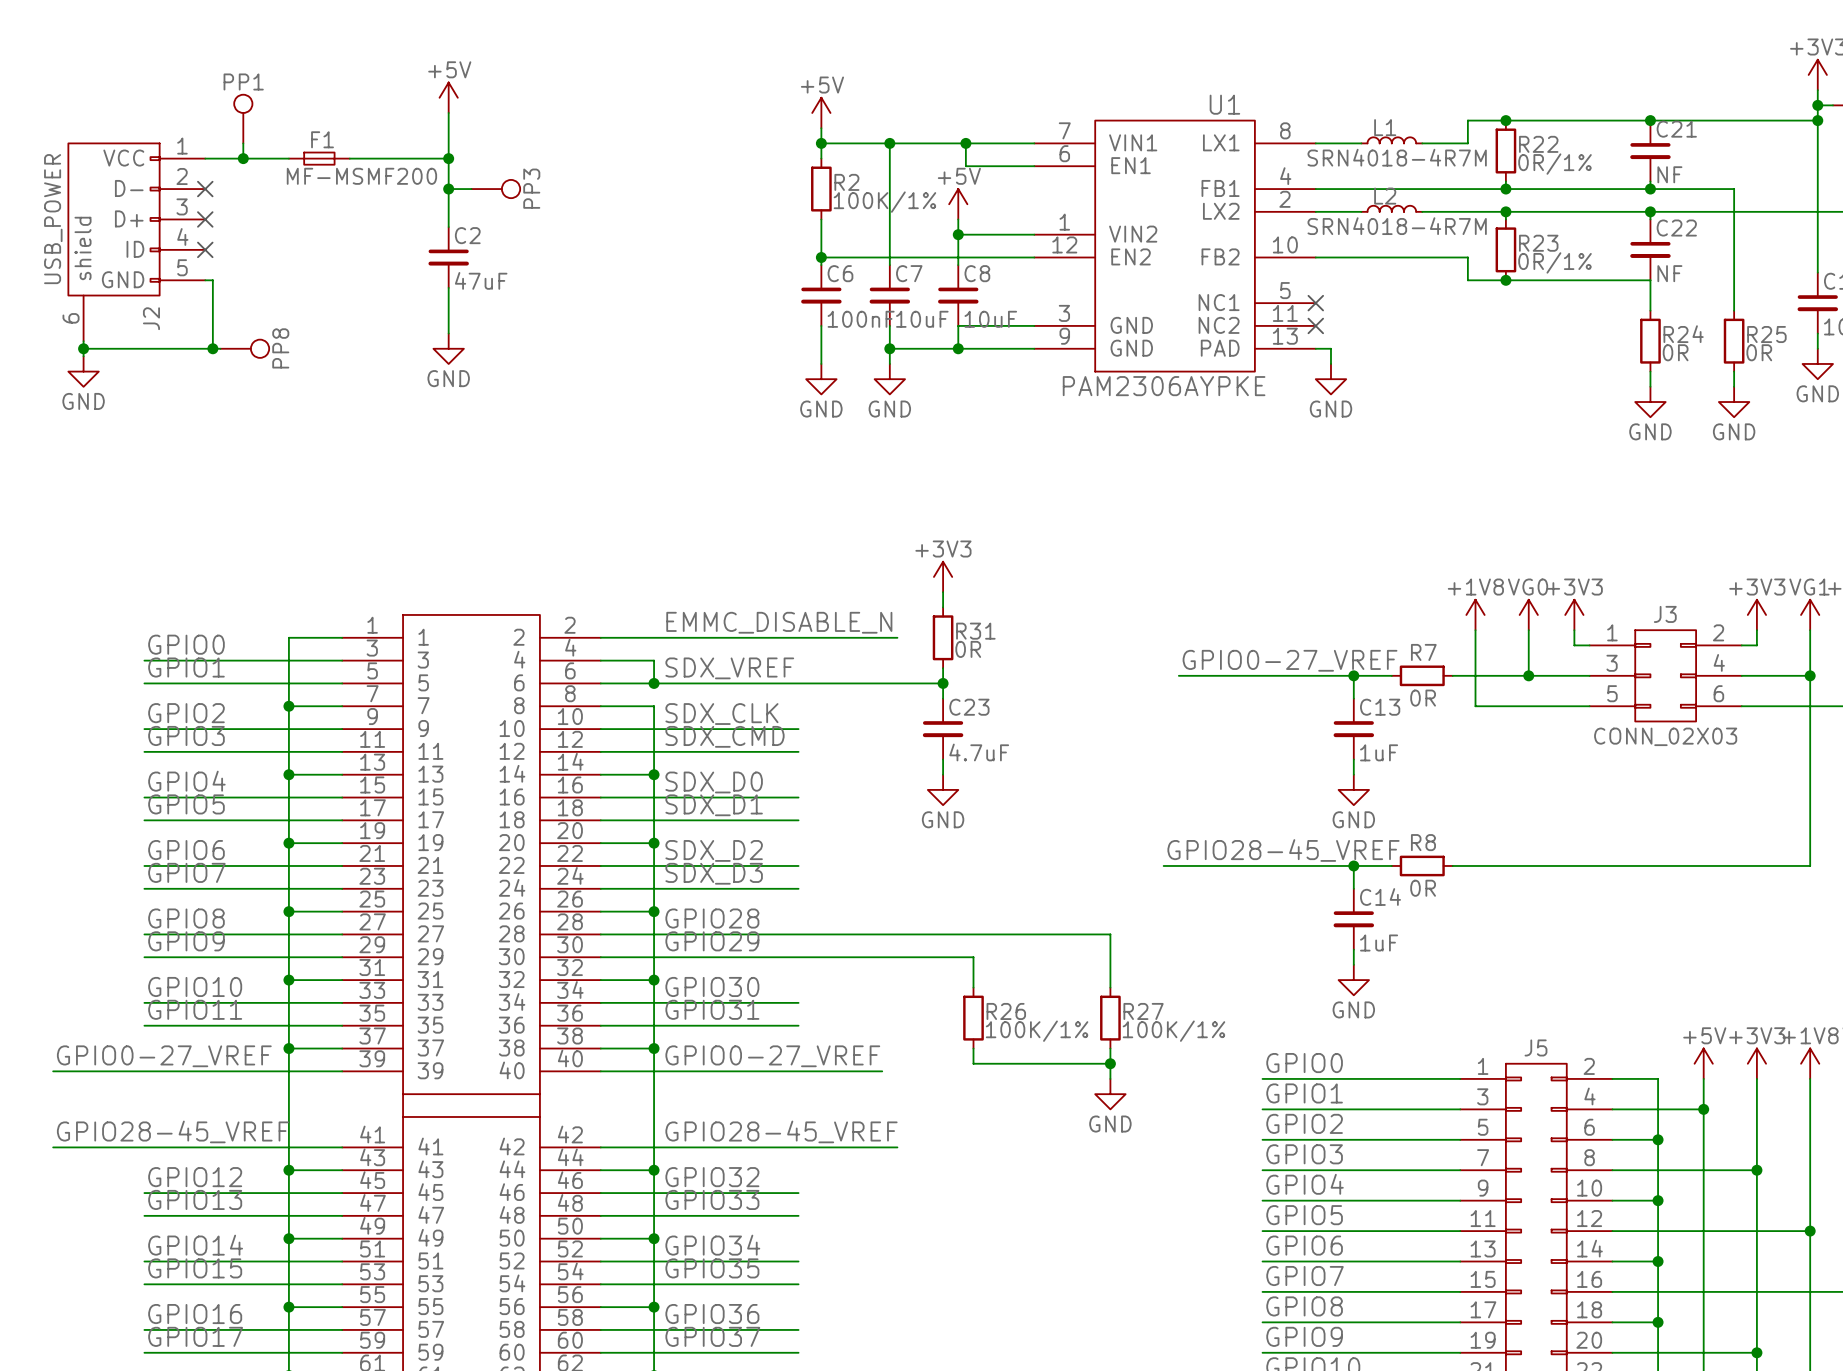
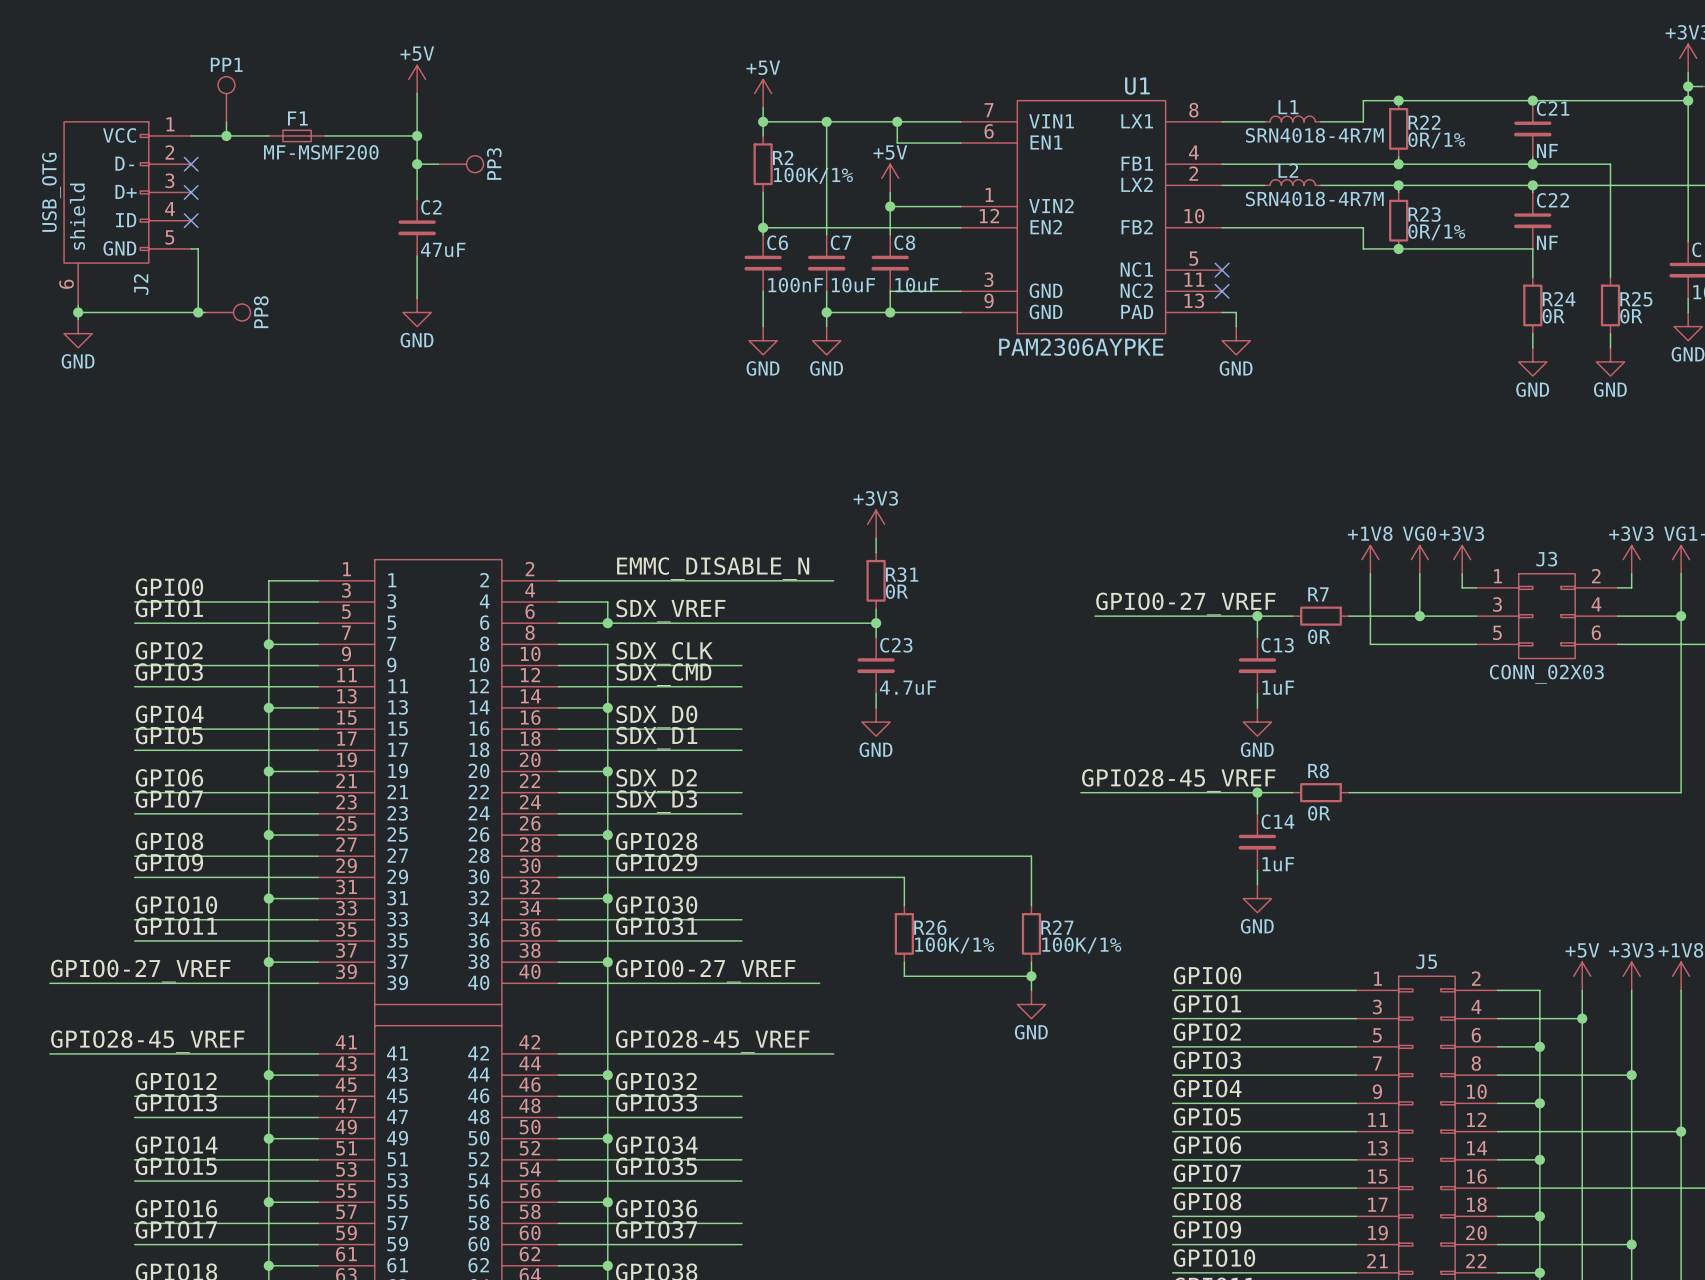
J2 value: USB_POWER (53, 219) -> USB_OTG (51, 192)

